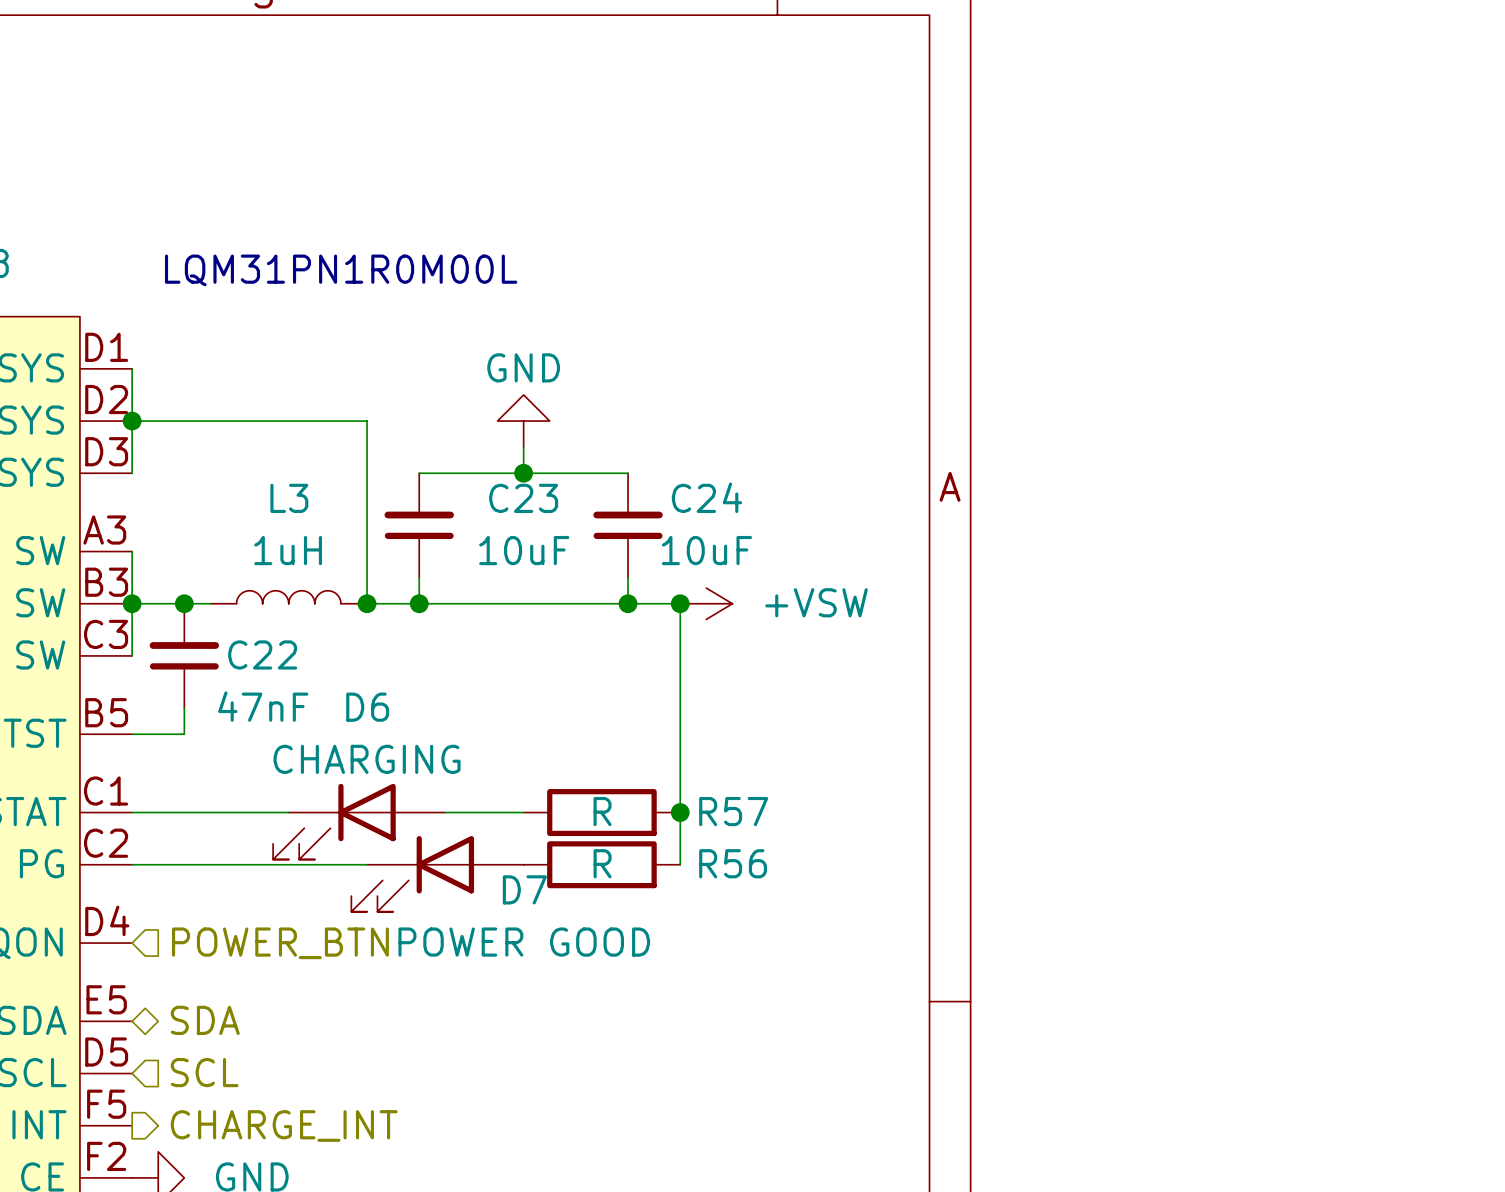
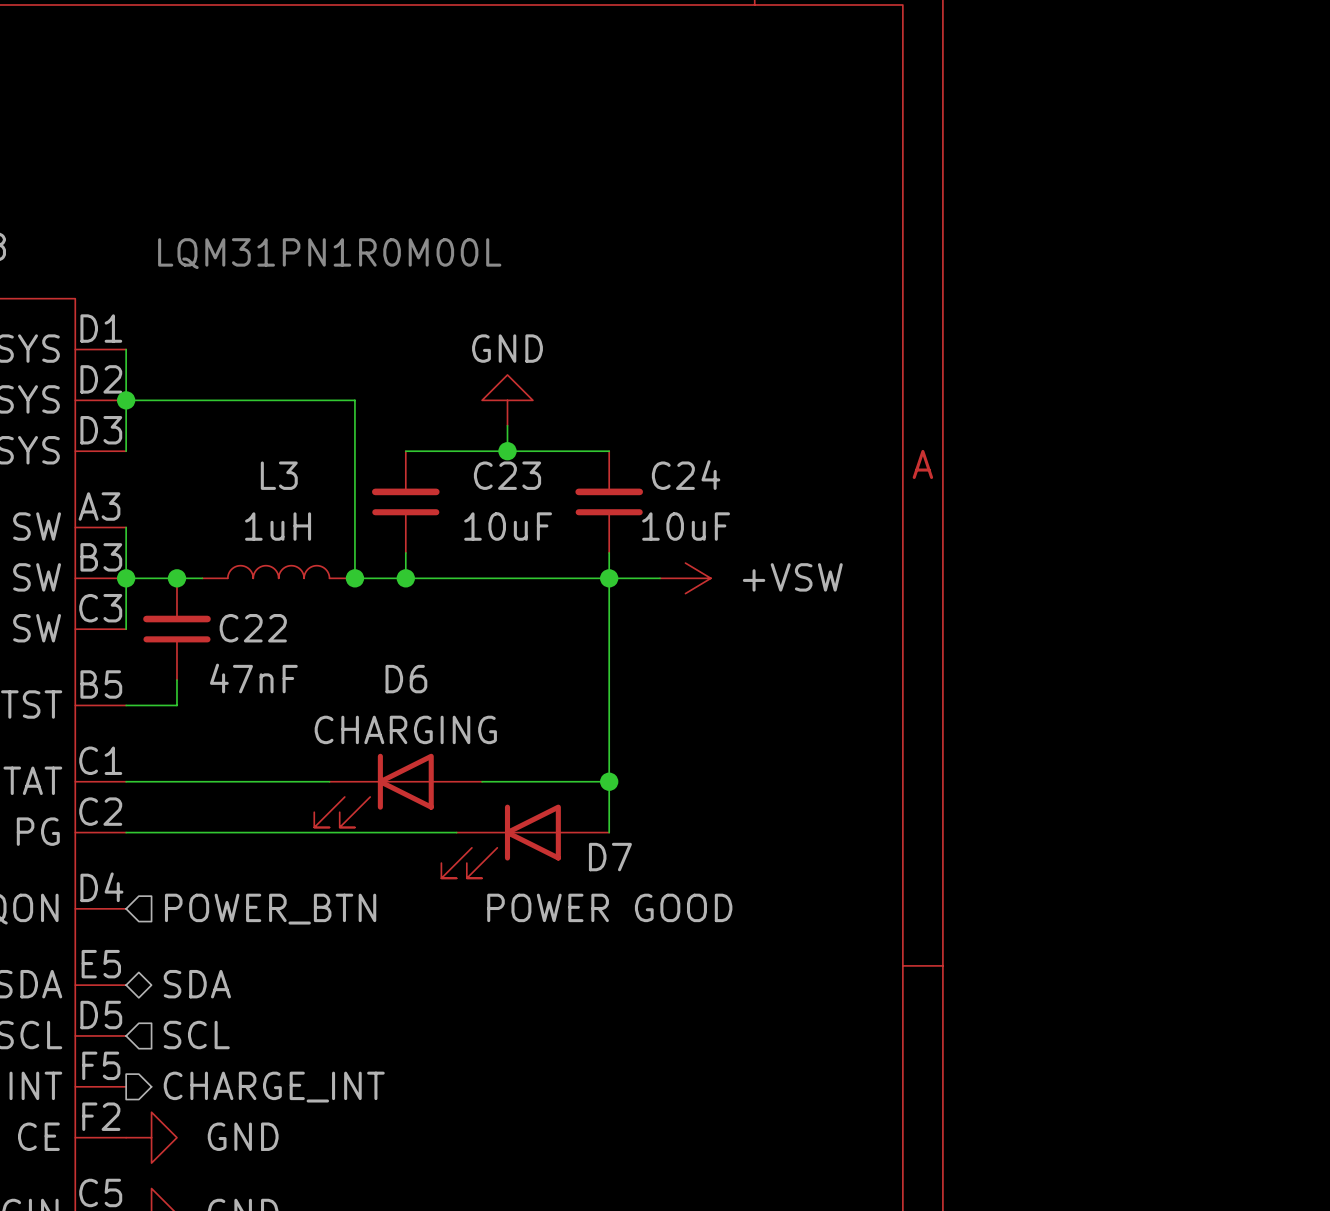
wire: (680, 603) (680, 864) -> (609, 578) (609, 832)
junction: (680, 603) -> none
wire: none -> (507, 781) (609, 781)
R57: R (601, 812) -> none
junction position: (680, 812) -> (609, 781)
D6 position: (359, 821) -> (398, 790)
R56: R (601, 864) -> none
D7 position: (437, 873) -> (525, 841)

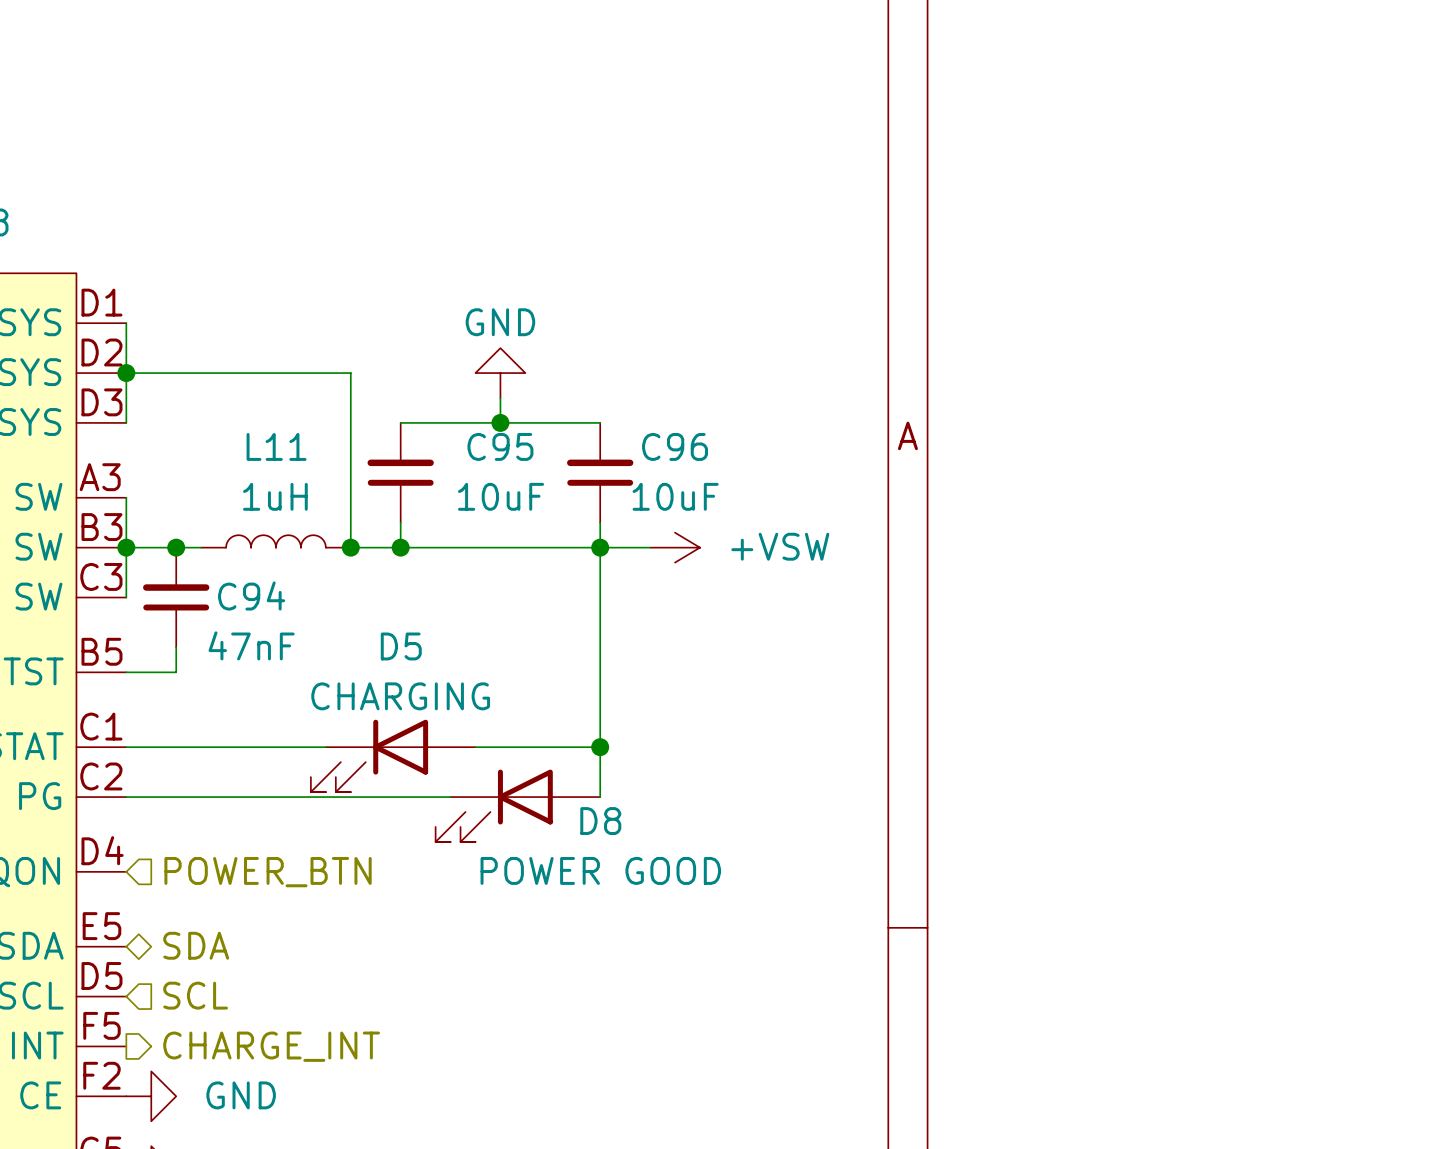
text: LQM31PN1R0M00L (329, 253) -> none
L3 name: L3 (279, 475) -> L11 (276, 446)
C23 name: C23 (507, 475) -> C95 (500, 446)
C24 name: C24 (686, 475) -> C96 (675, 446)
C22 name: C22 (253, 628) -> C94 (251, 595)
D6 name: D6 (406, 679) -> D5 (401, 646)
D7 name: D7 (610, 857) -> D8 (600, 821)

